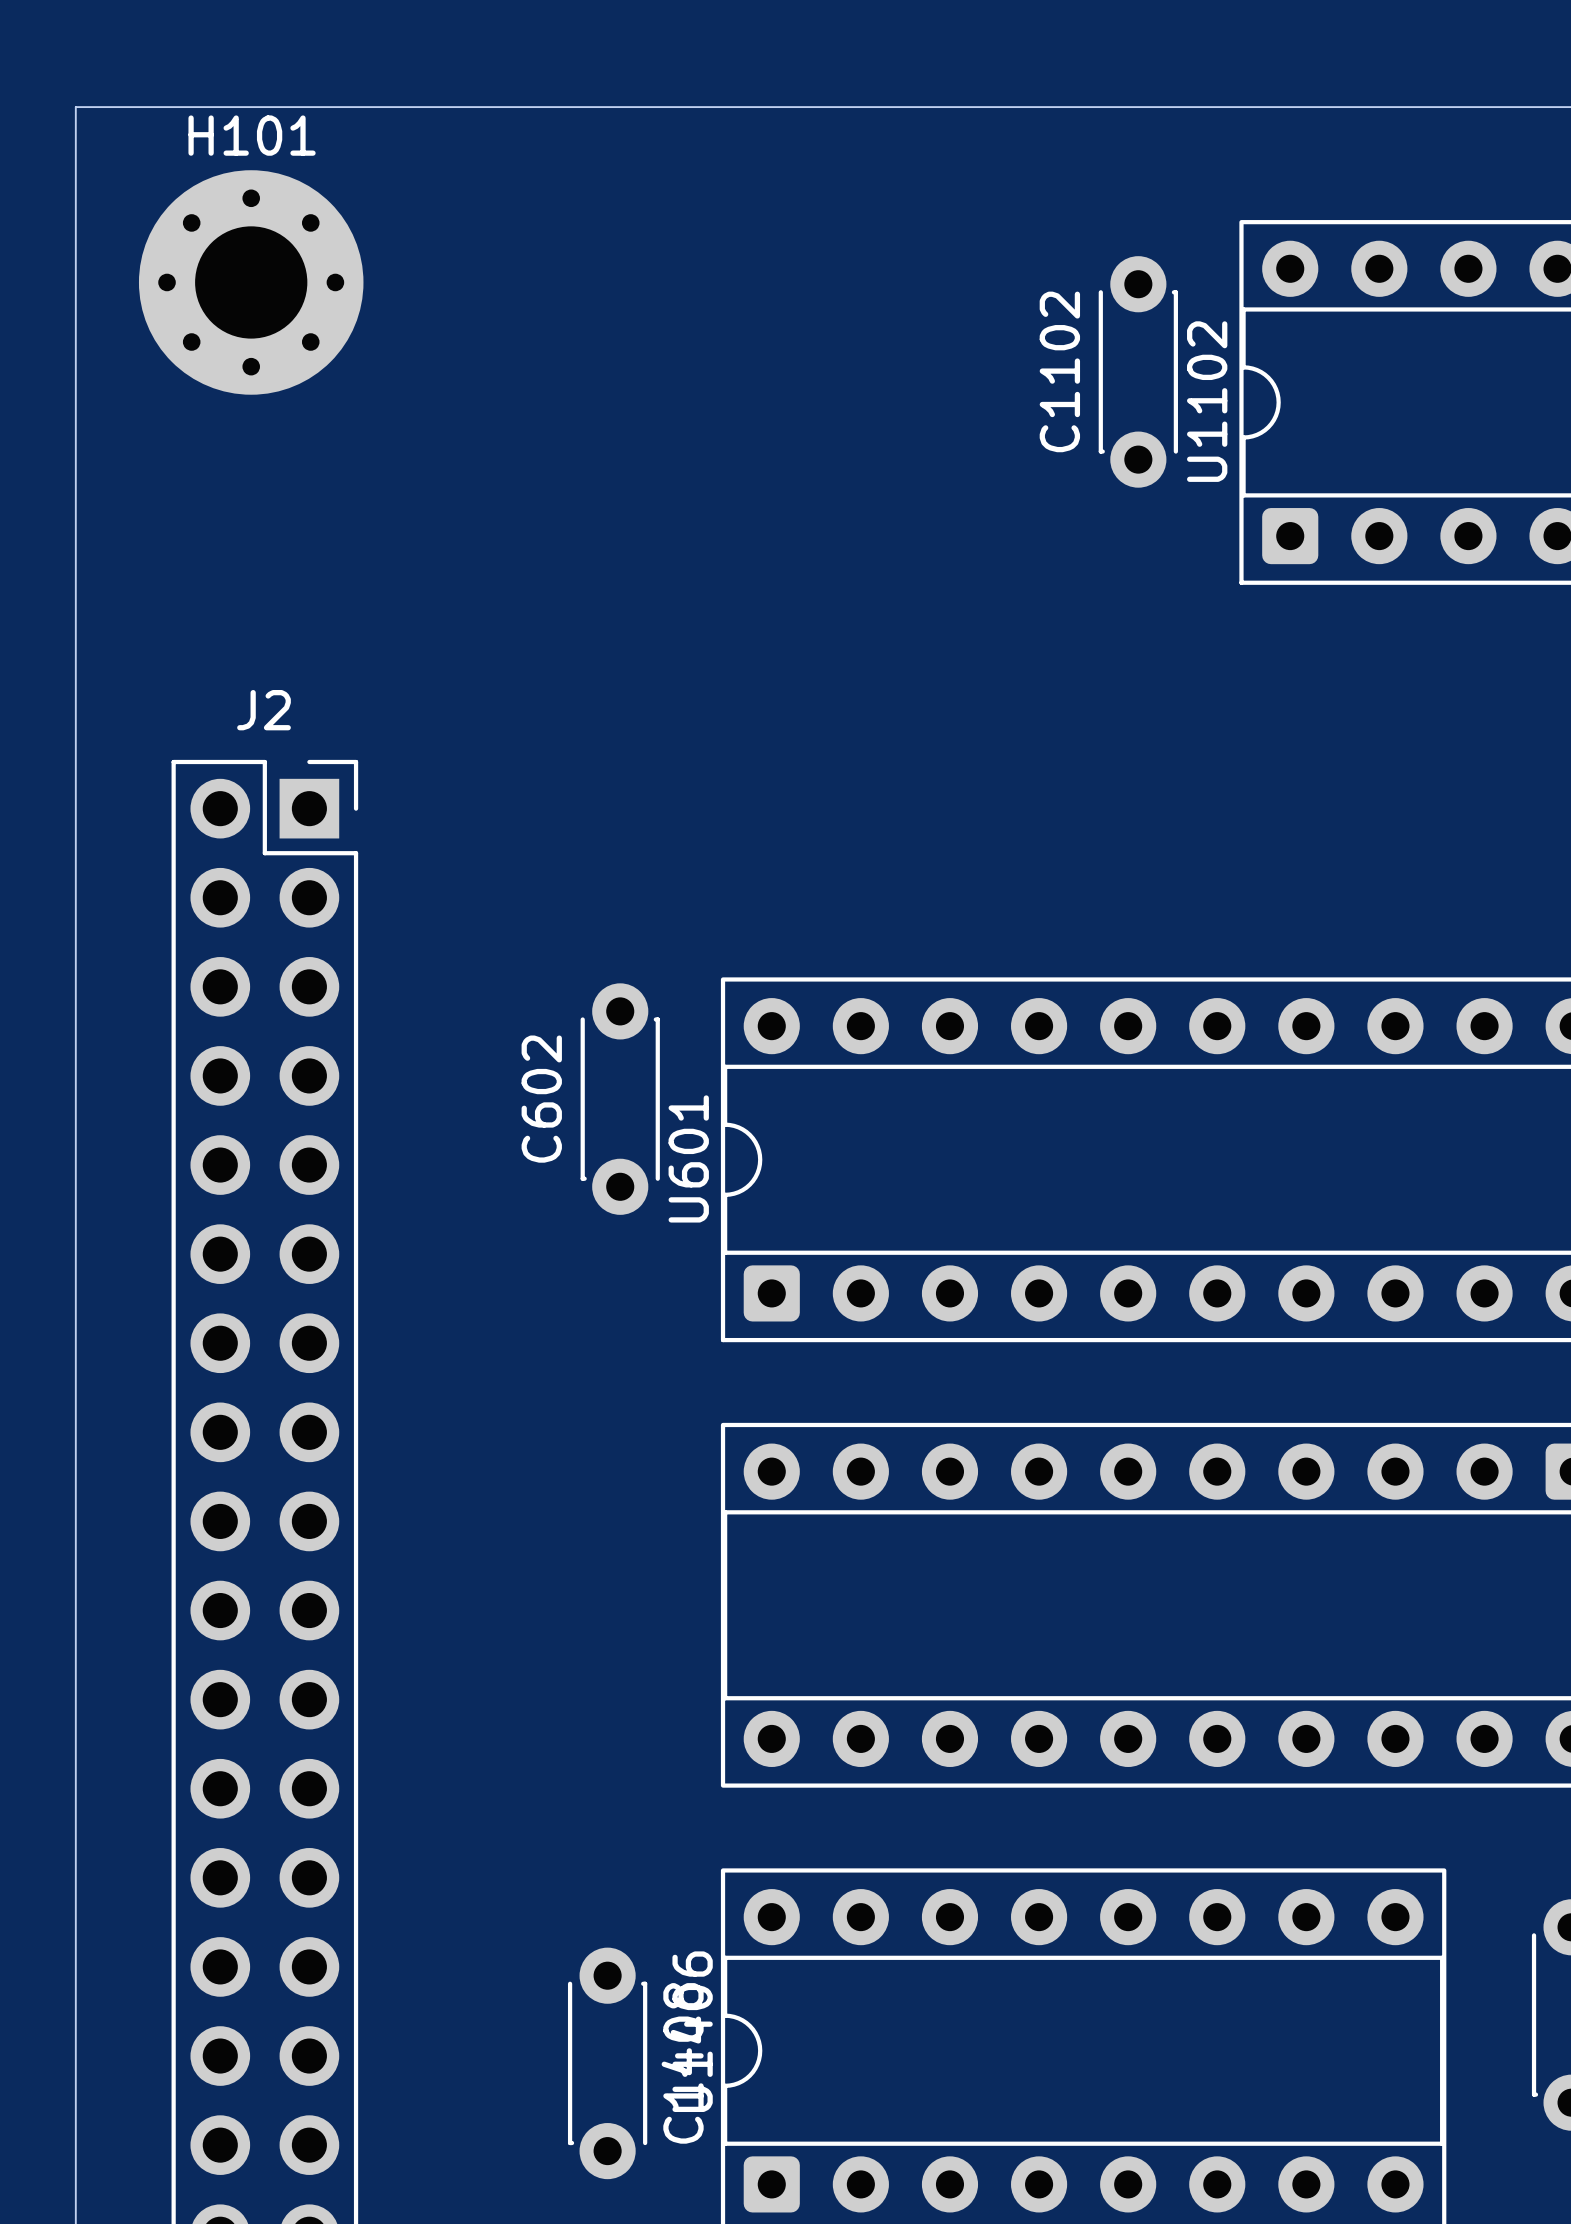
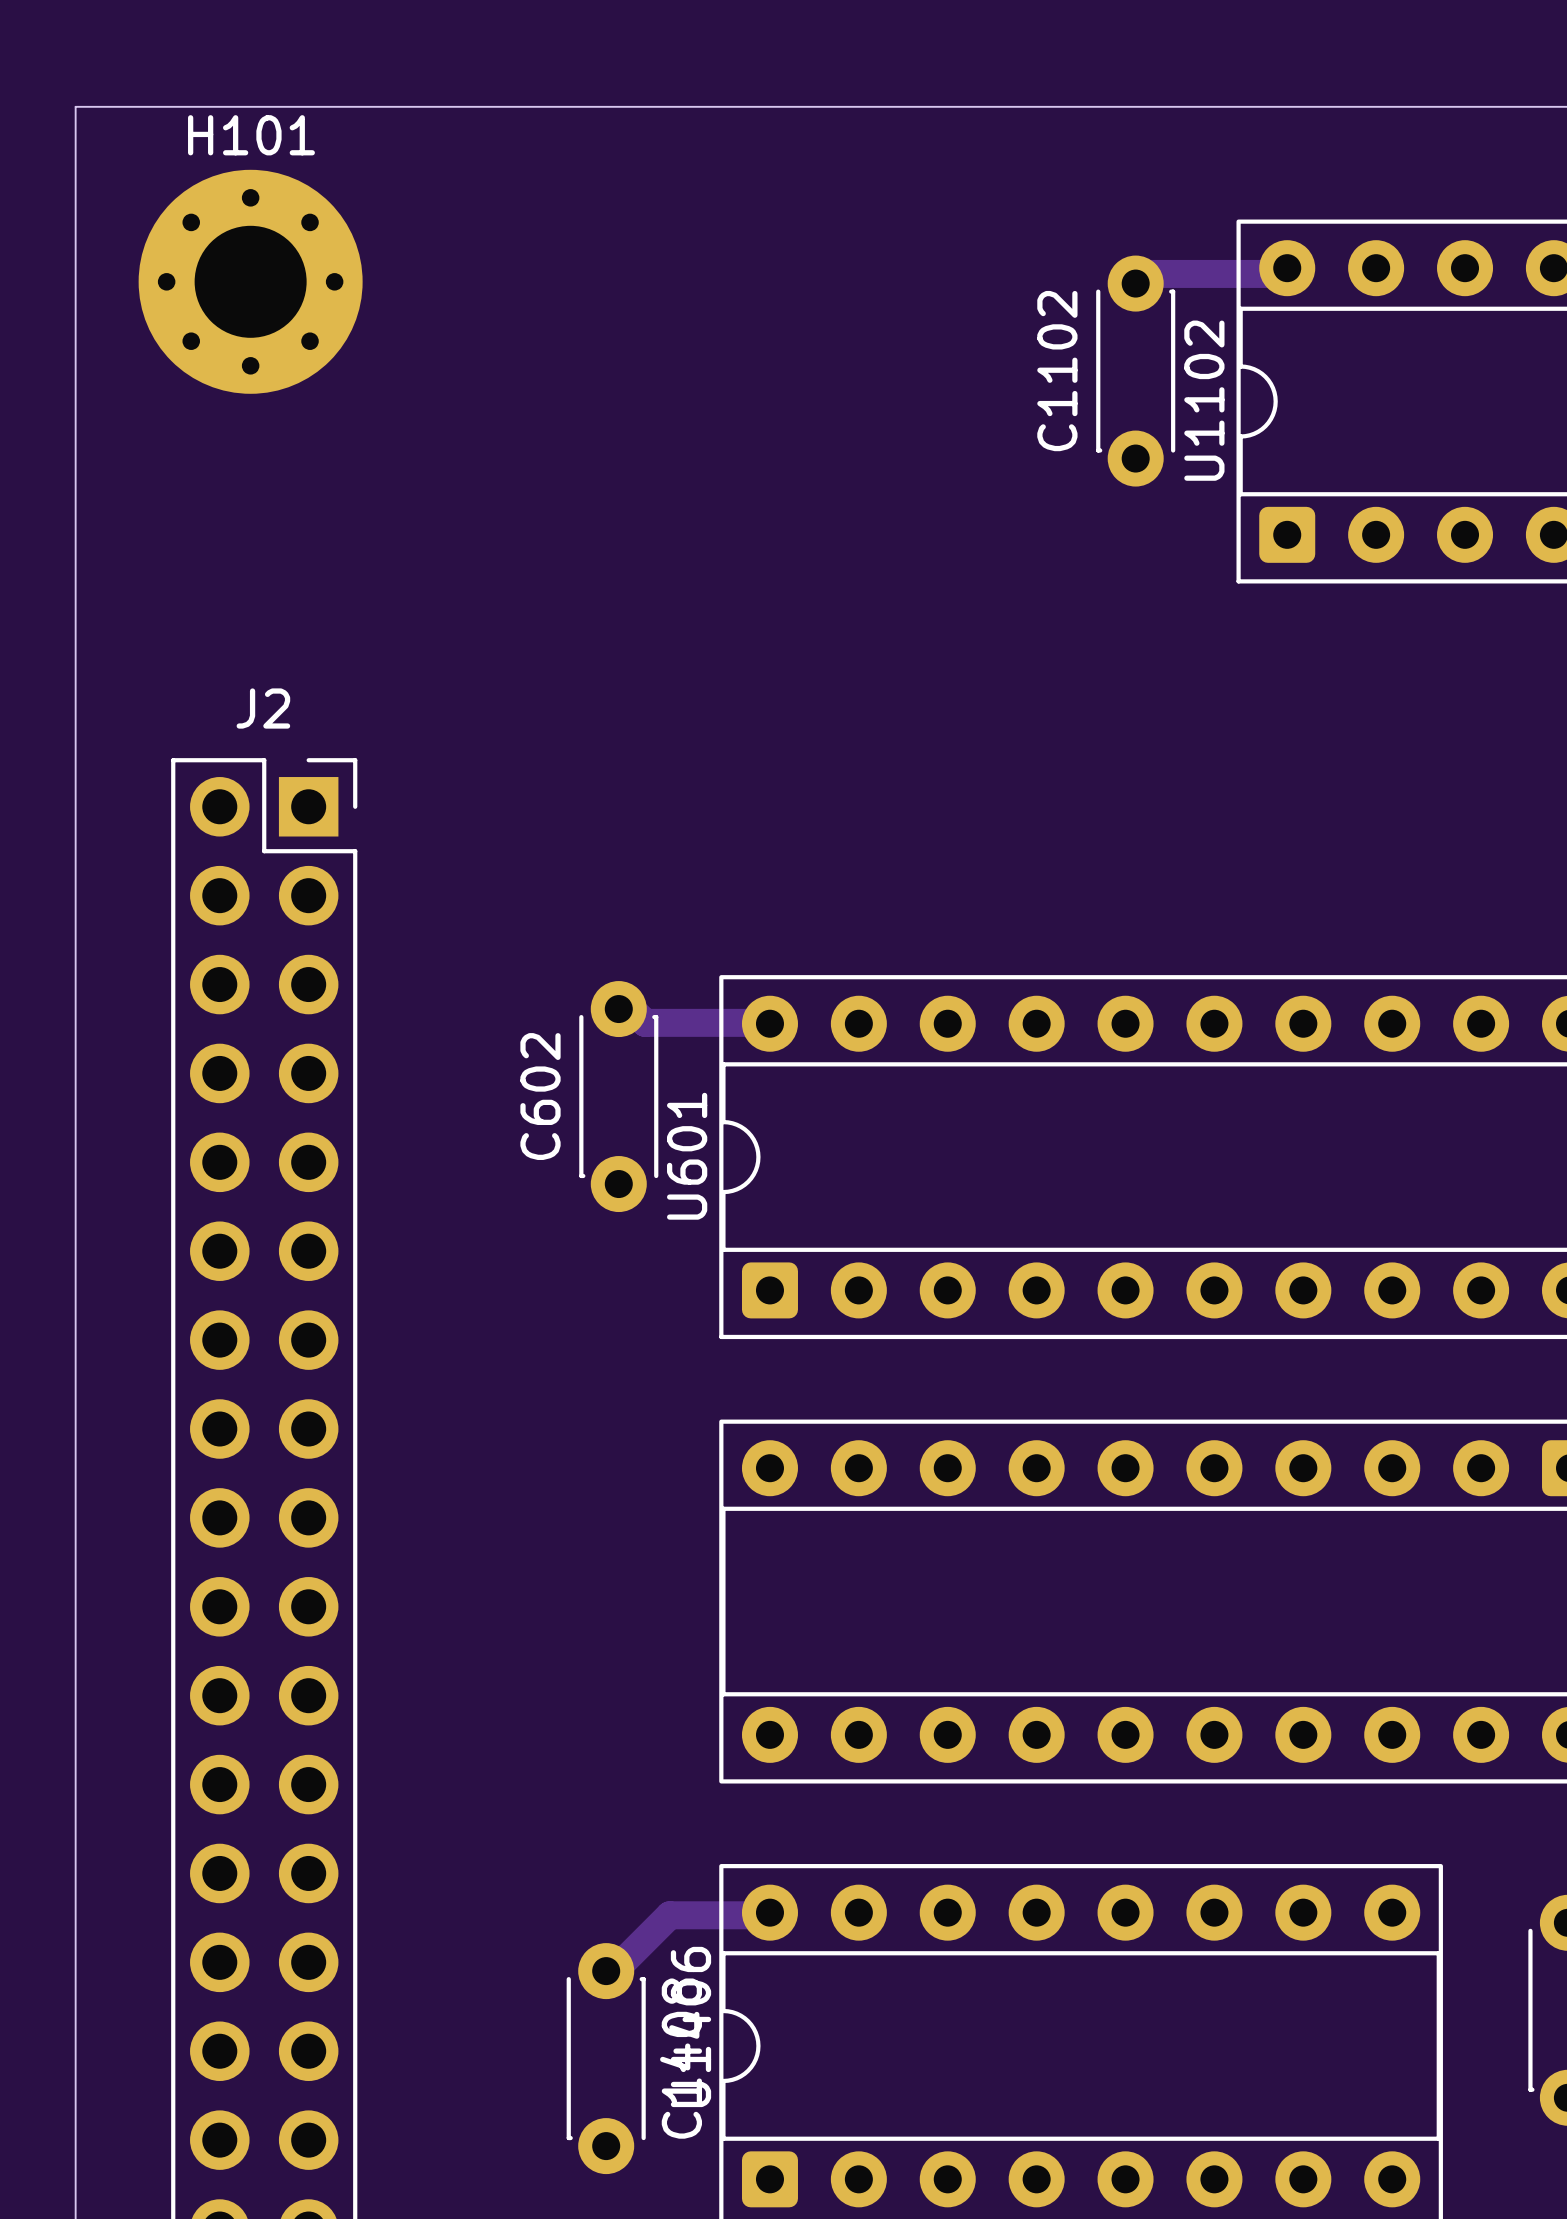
track: none -> (1149, 273) (1271, 273)
track: none -> (634, 1012) (645, 1022) (753, 1022)
track: none -> (753, 1915) (669, 1915) (620, 1964)

